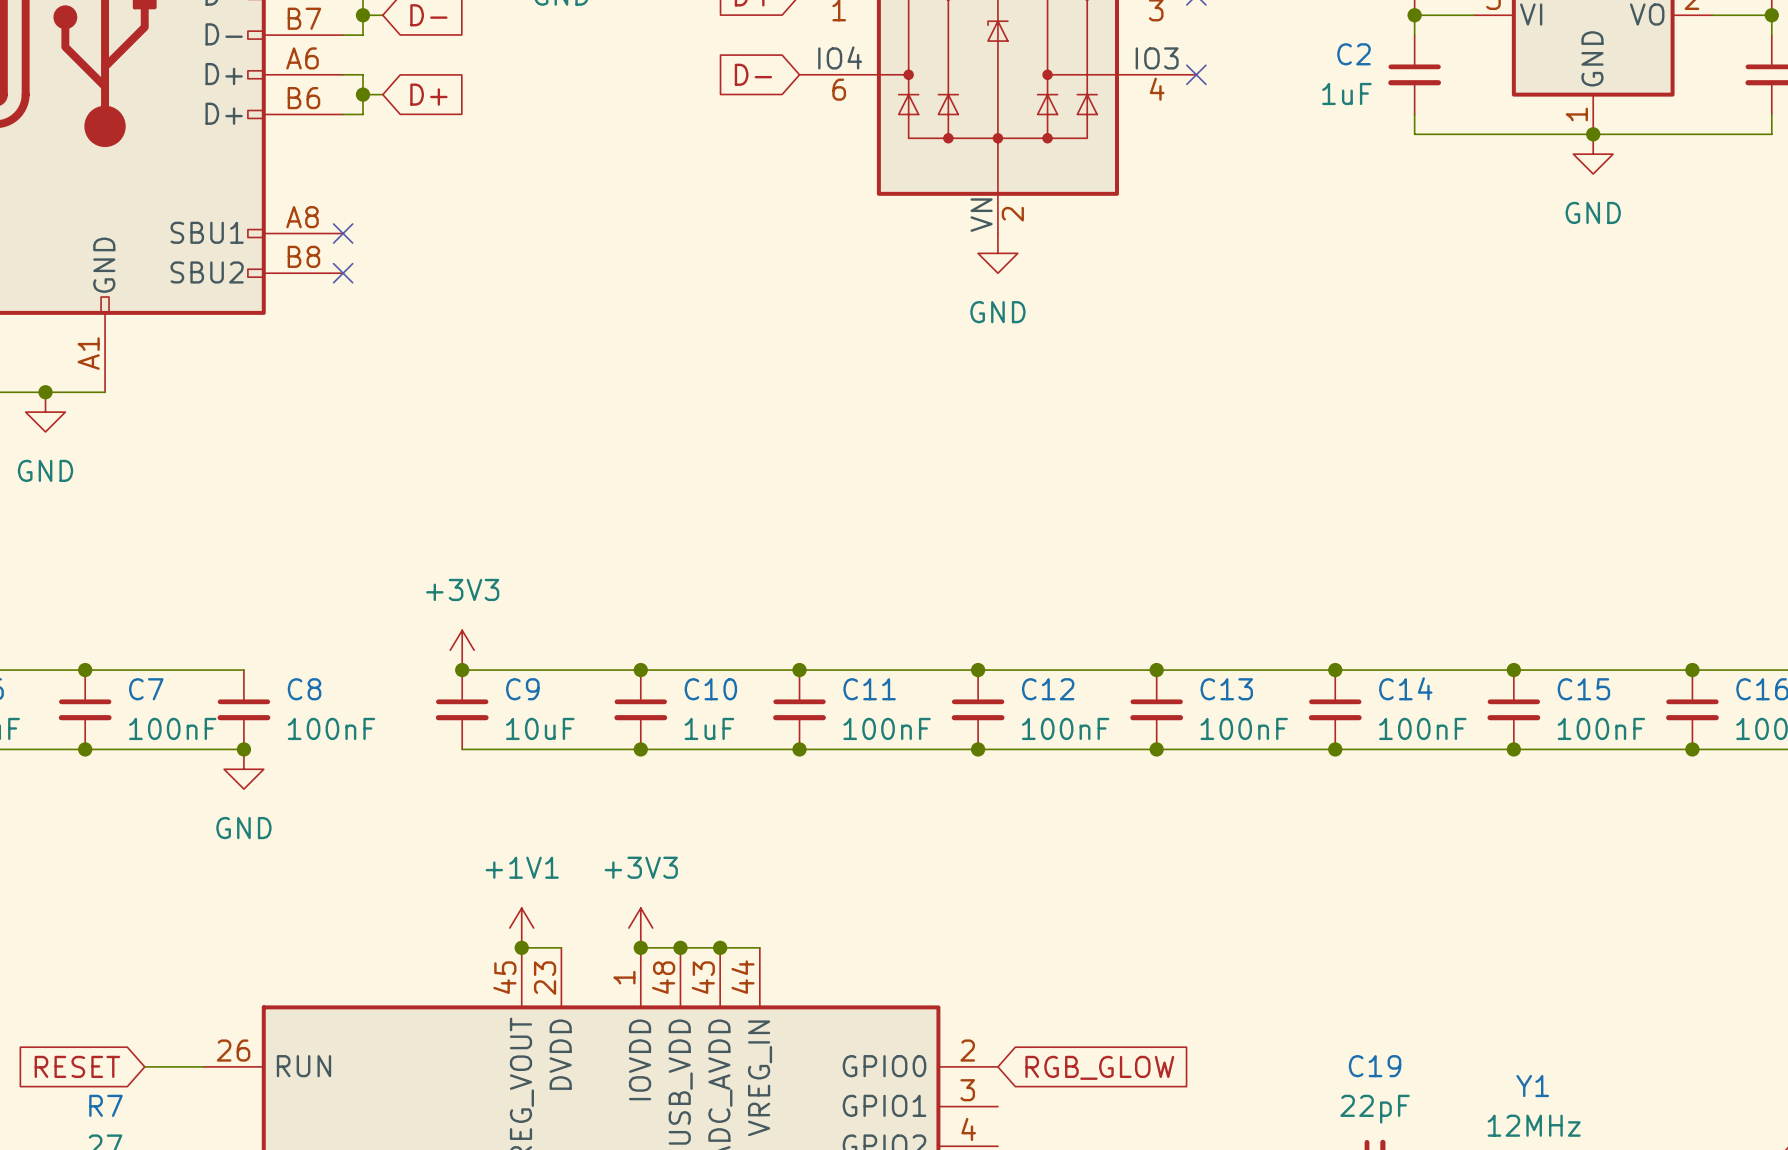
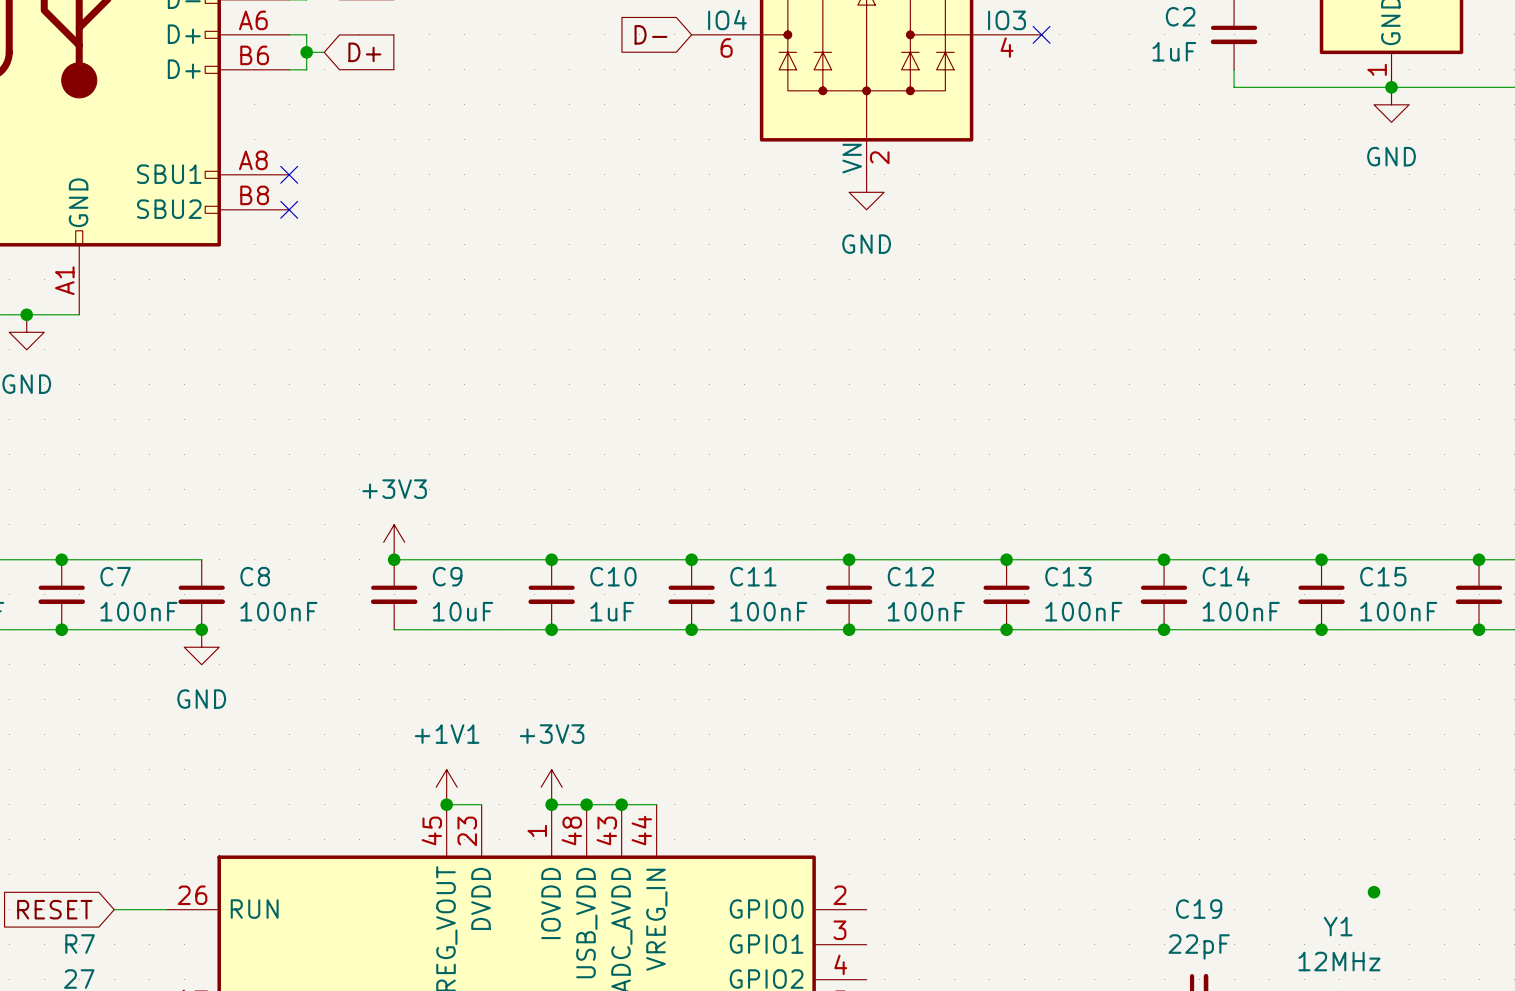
junction: none -> (1374, 892)
global label: RGB_GLOW (1099, 1067) -> none

